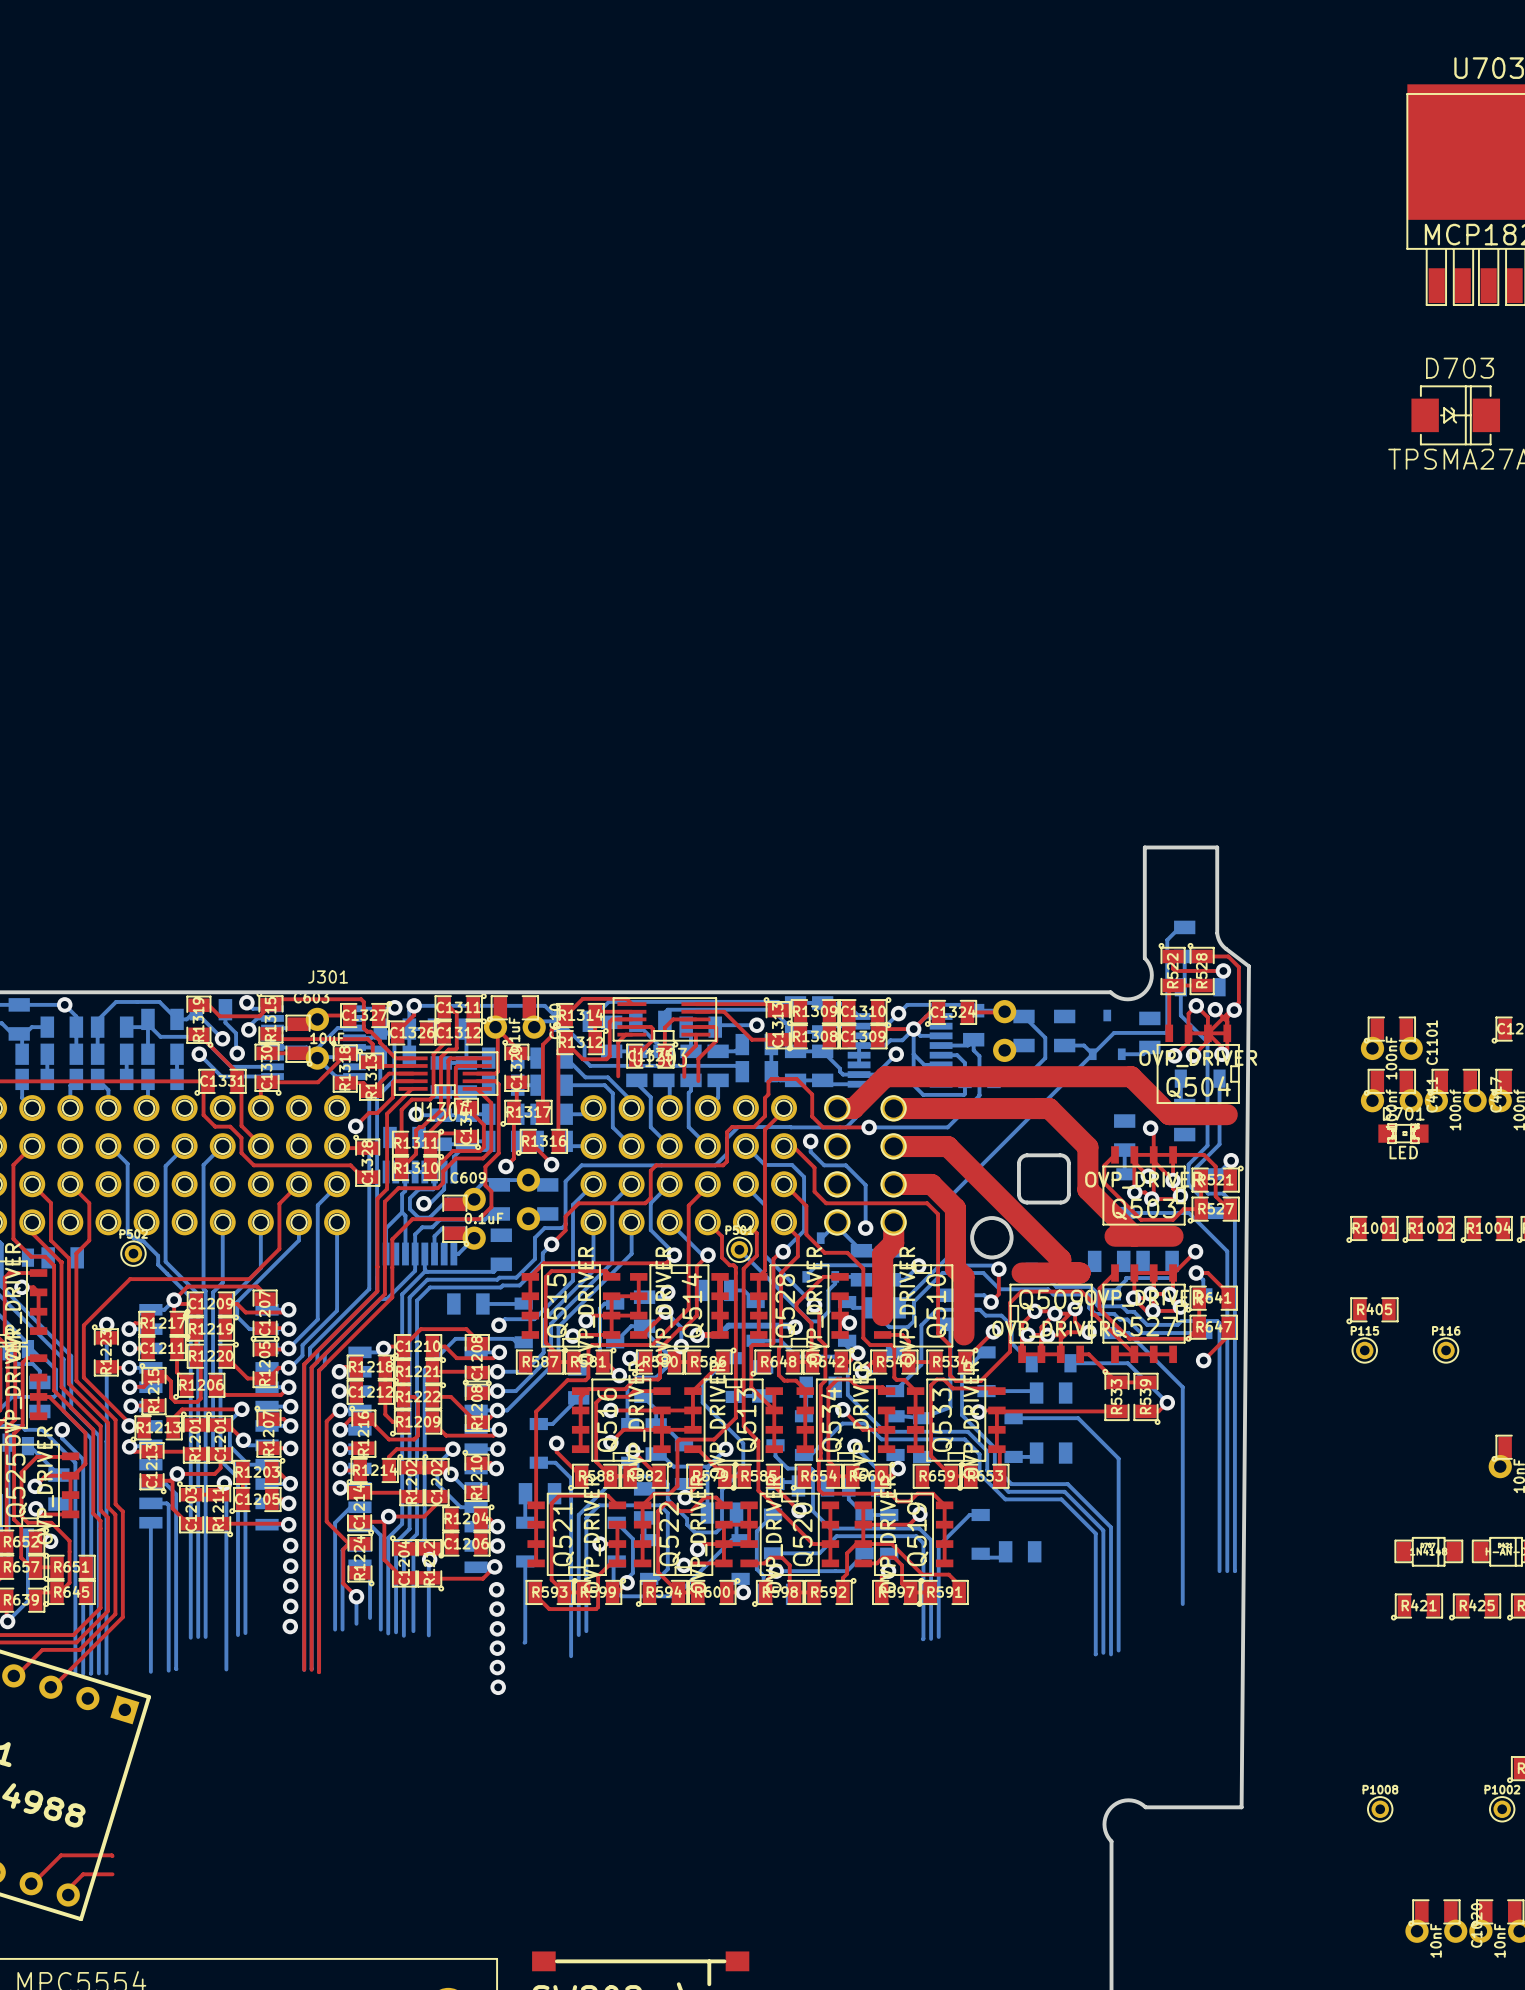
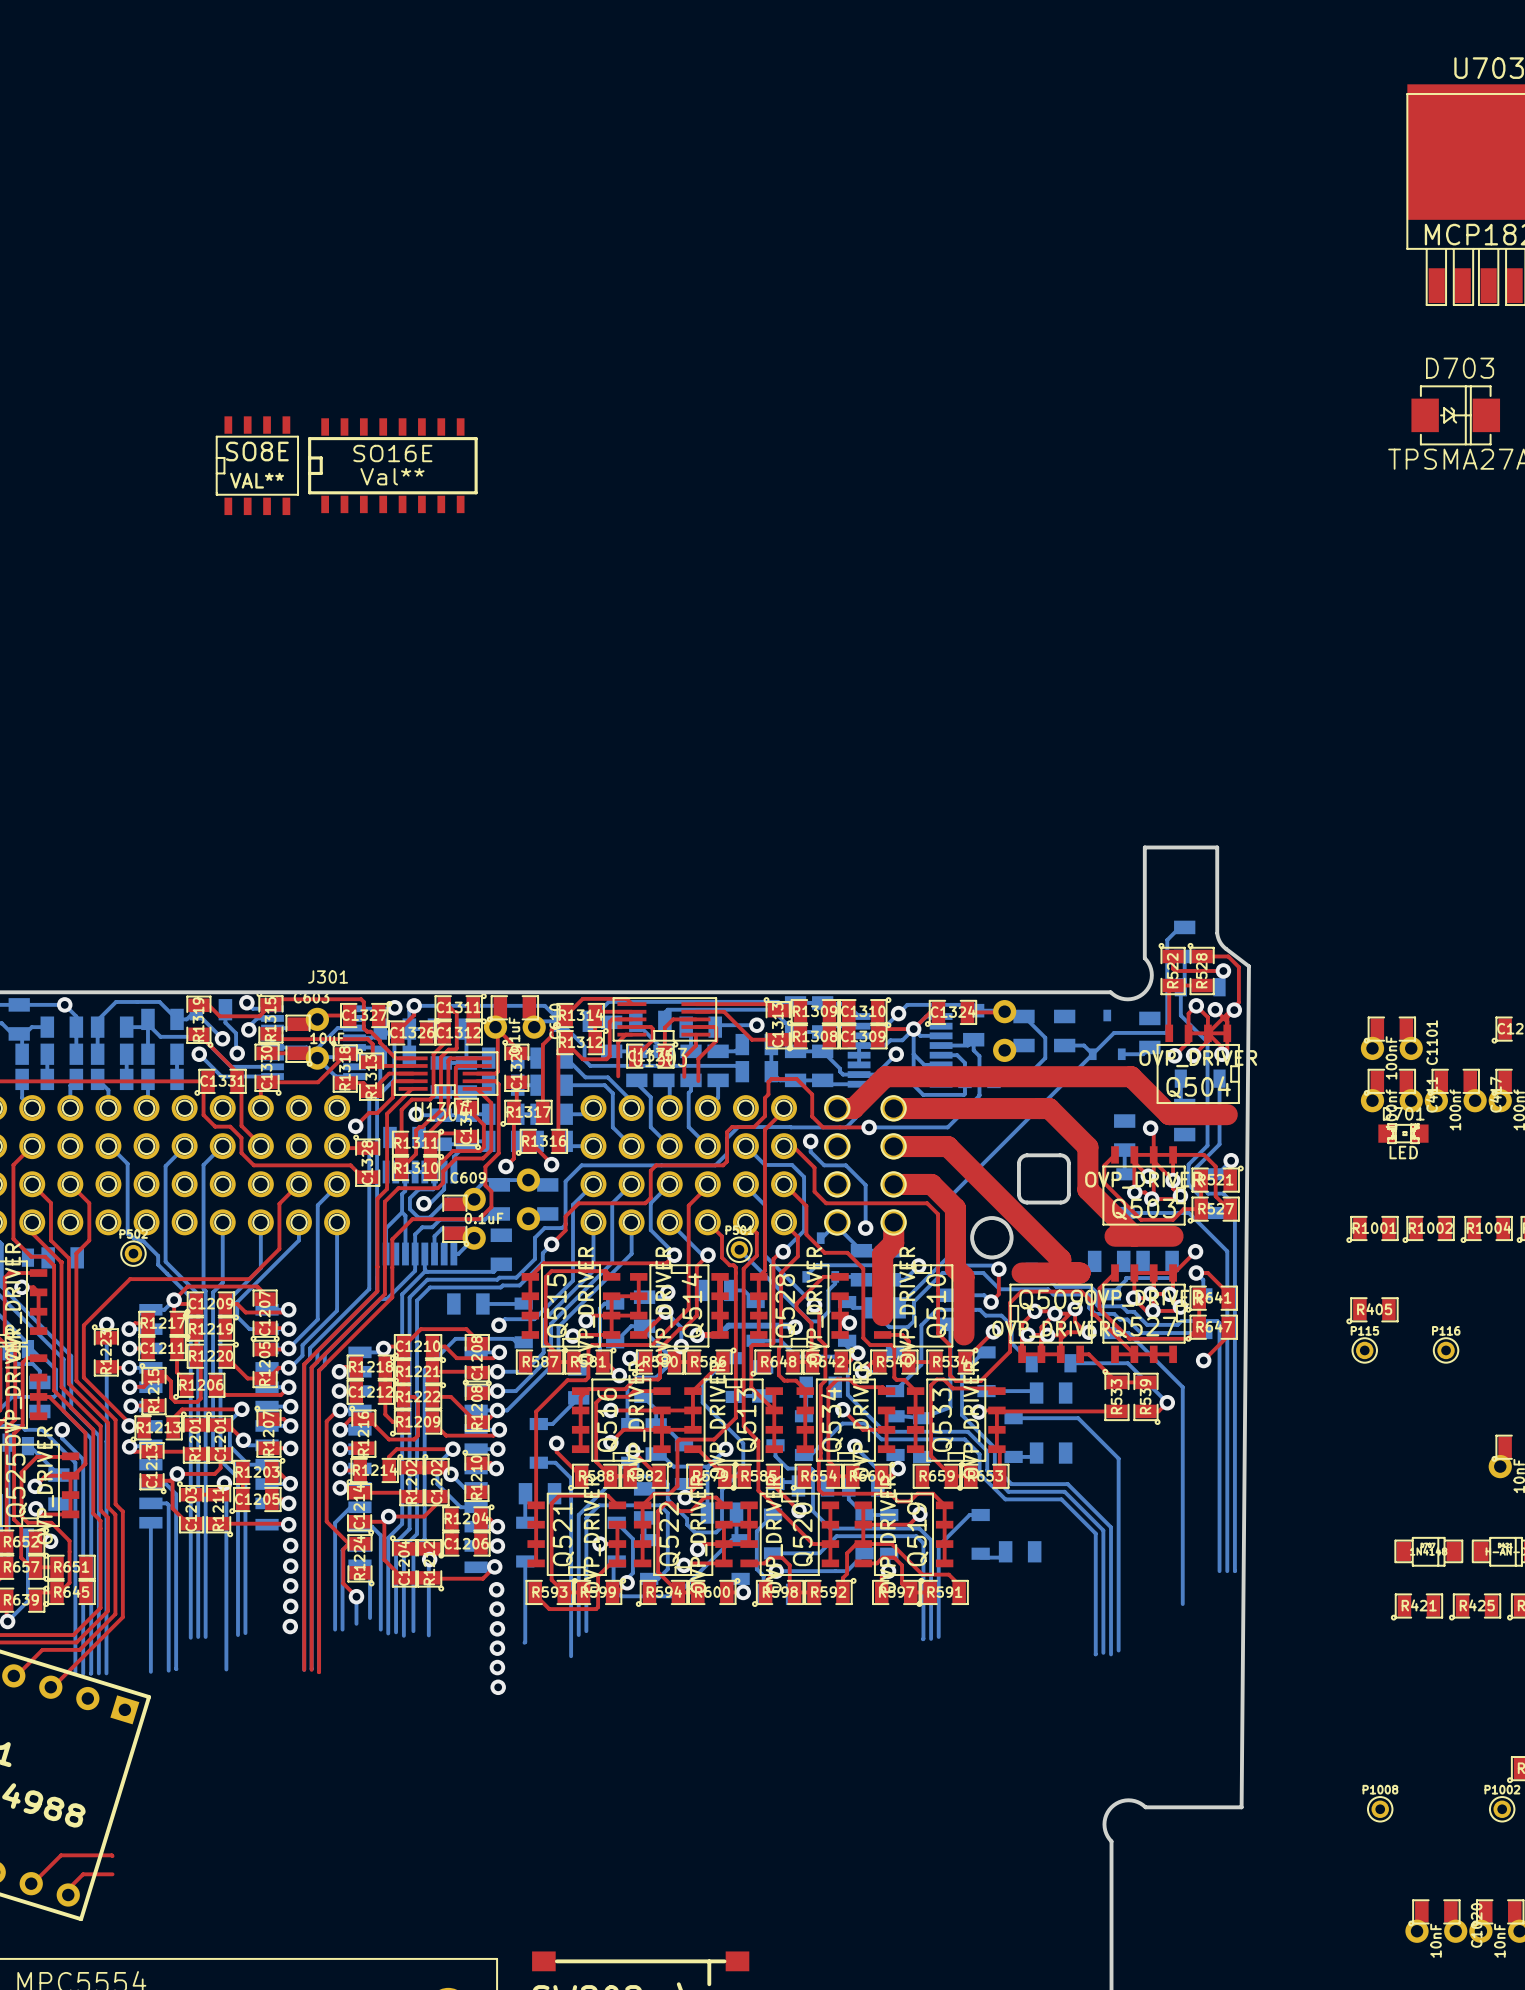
SO8E: none -> VAL** (257, 465)
SO16E: none -> Val** (392, 465)

